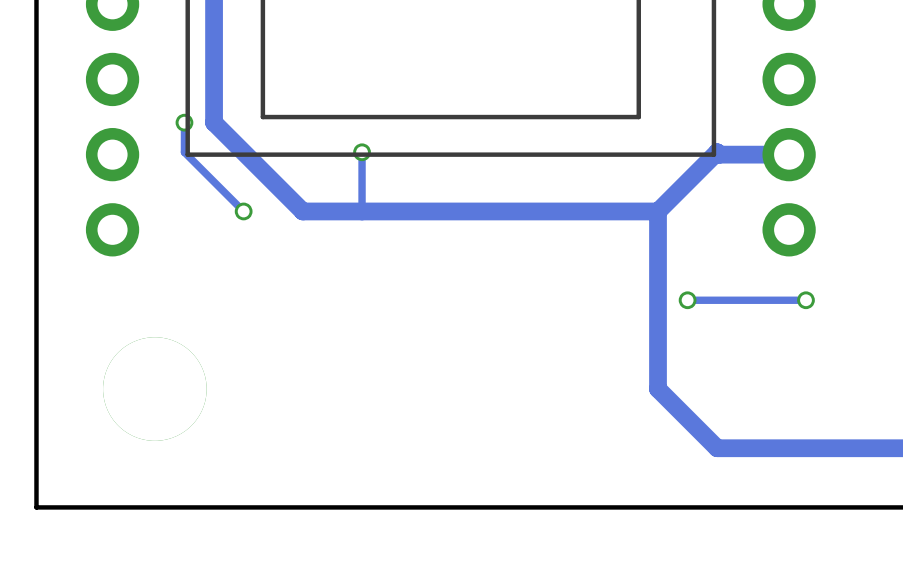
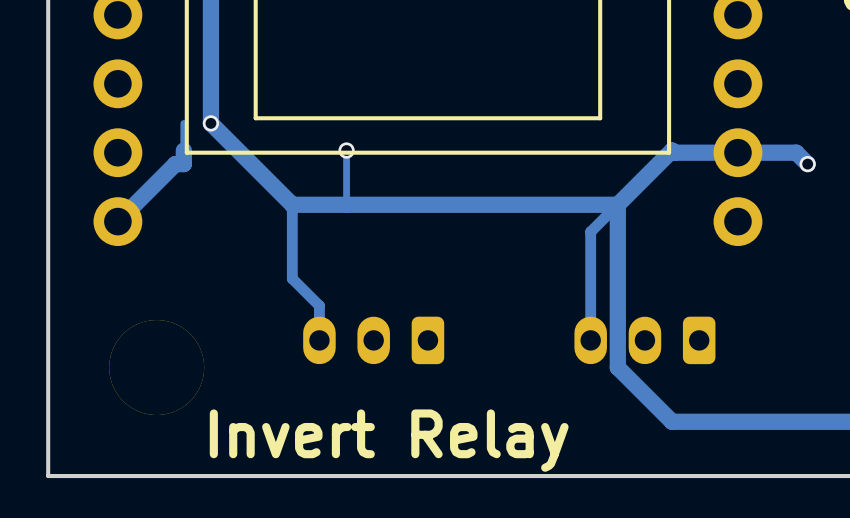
via position: (184, 122) -> (210, 123)
track: (184, 152) (243, 211) -> (183, 150) (183, 164) (175, 164) (117, 221)
track: none -> (737, 152) (796, 152) (807, 164)
via: none -> (807, 164)
via: (243, 211) -> none
track: none -> (292, 204) (292, 278) (319, 305) (319, 340)
track: none -> (617, 204) (590, 231) (590, 340)
via: (687, 300) -> none
track: (805, 300) (687, 300) -> none
via: (805, 300) -> none
part: none -> (373, 340)
part: none -> (644, 340)
text: none -> Invert Relay (389, 440)

